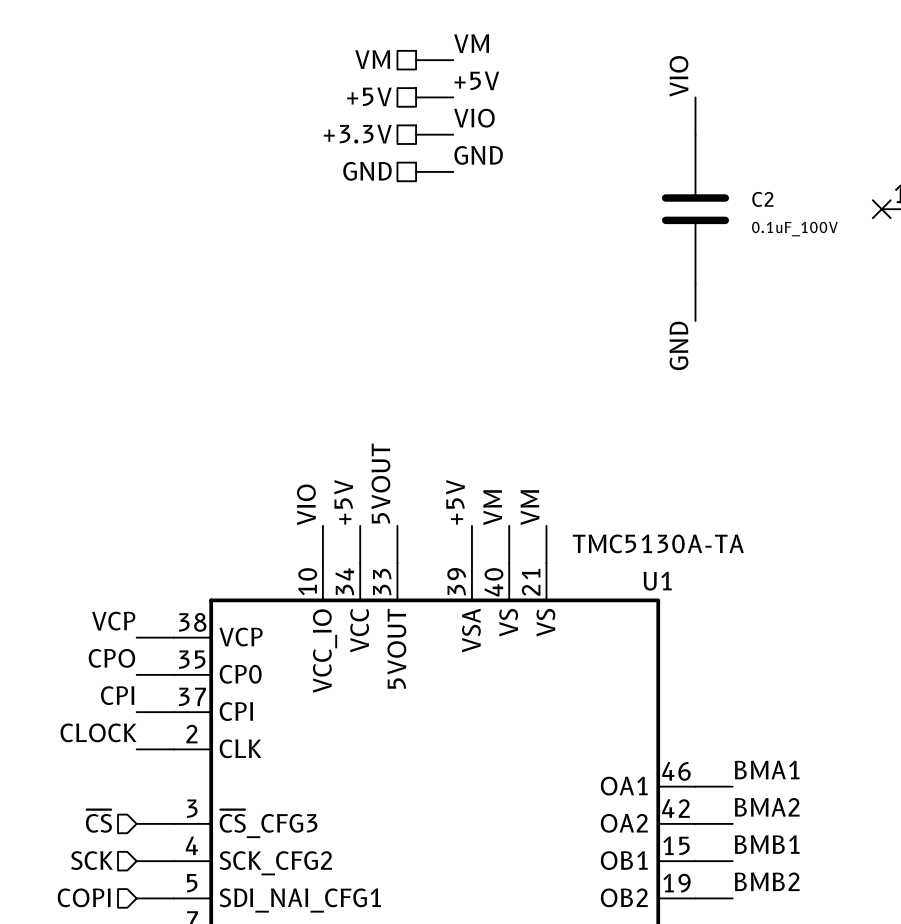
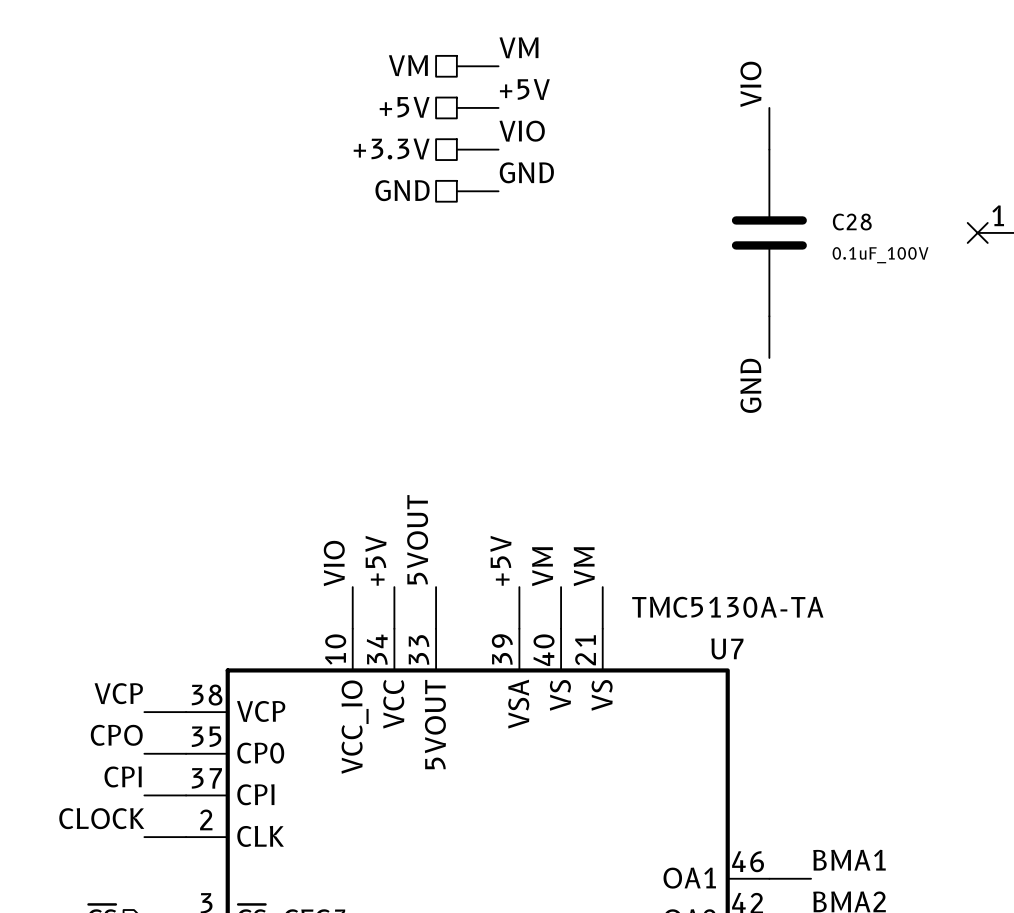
C2 name: C2 (762, 199) -> C28 (852, 222)
U1 name: U1 (657, 581) -> U7 (727, 648)

